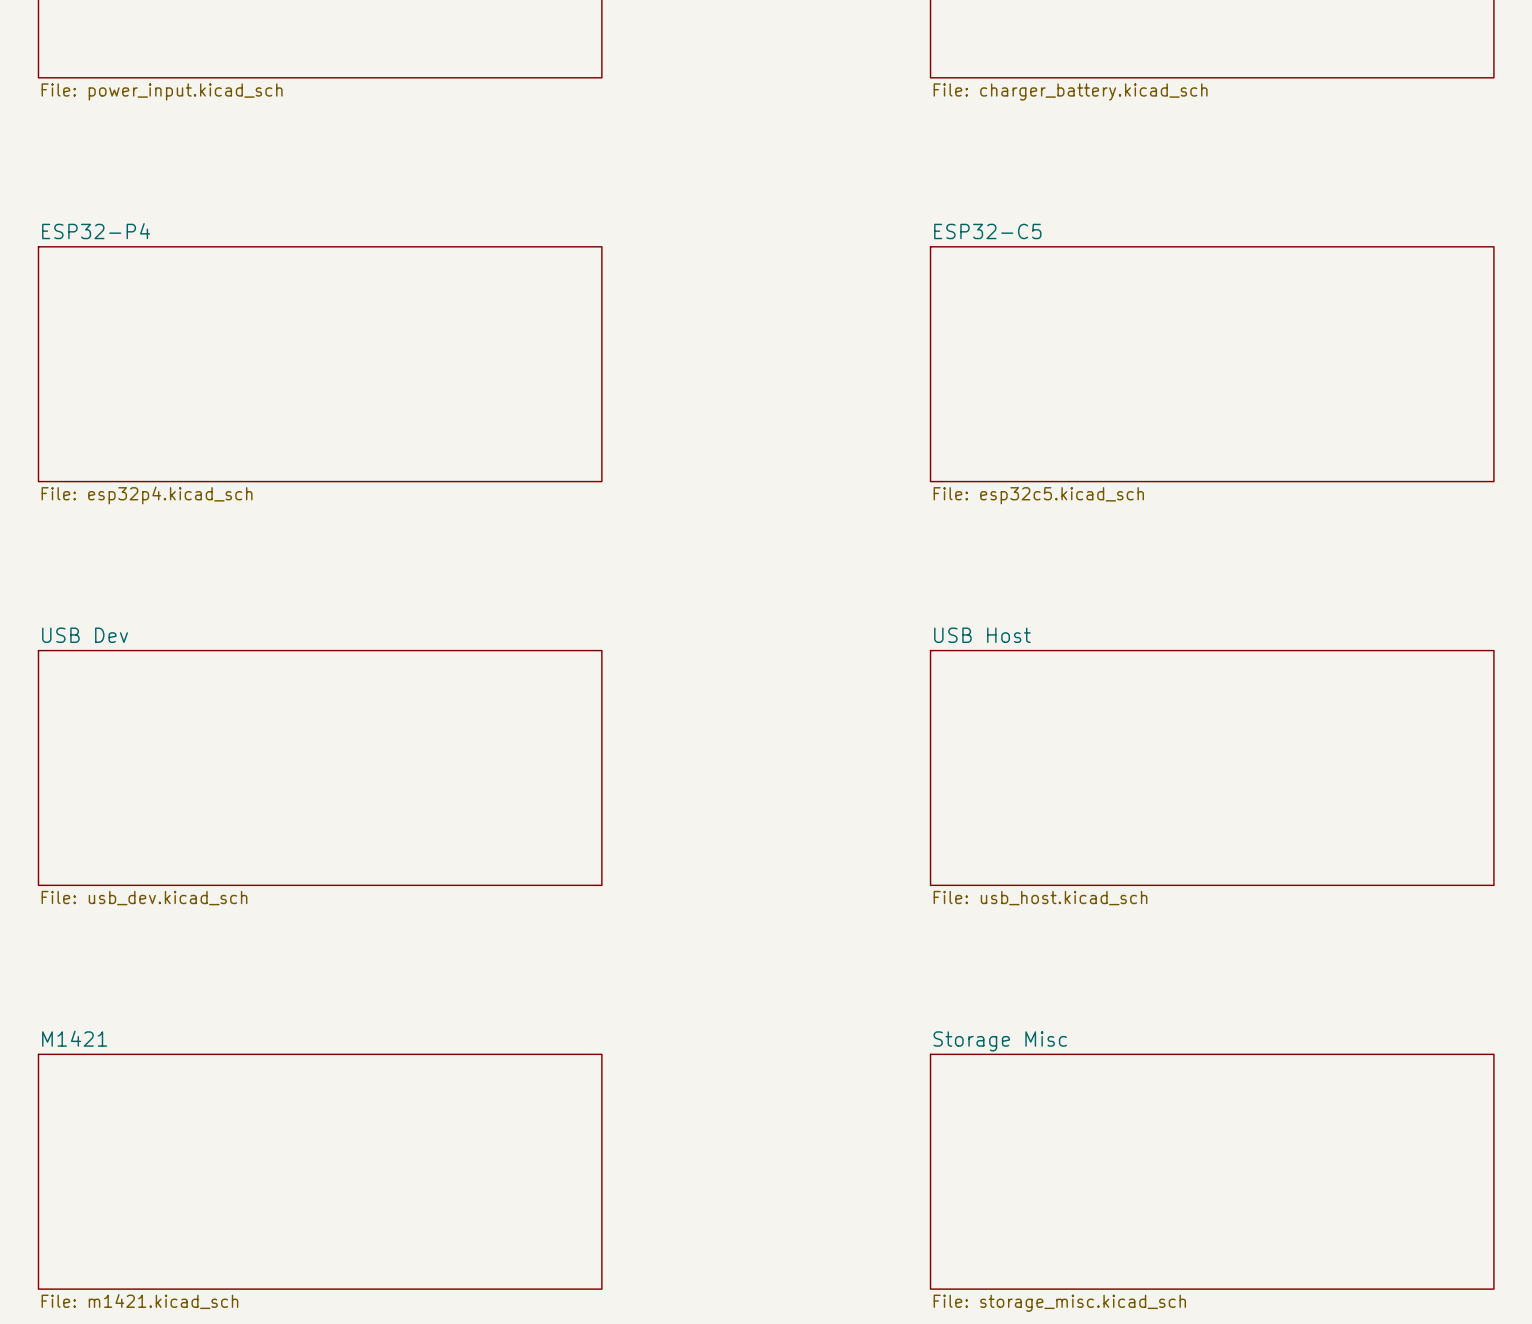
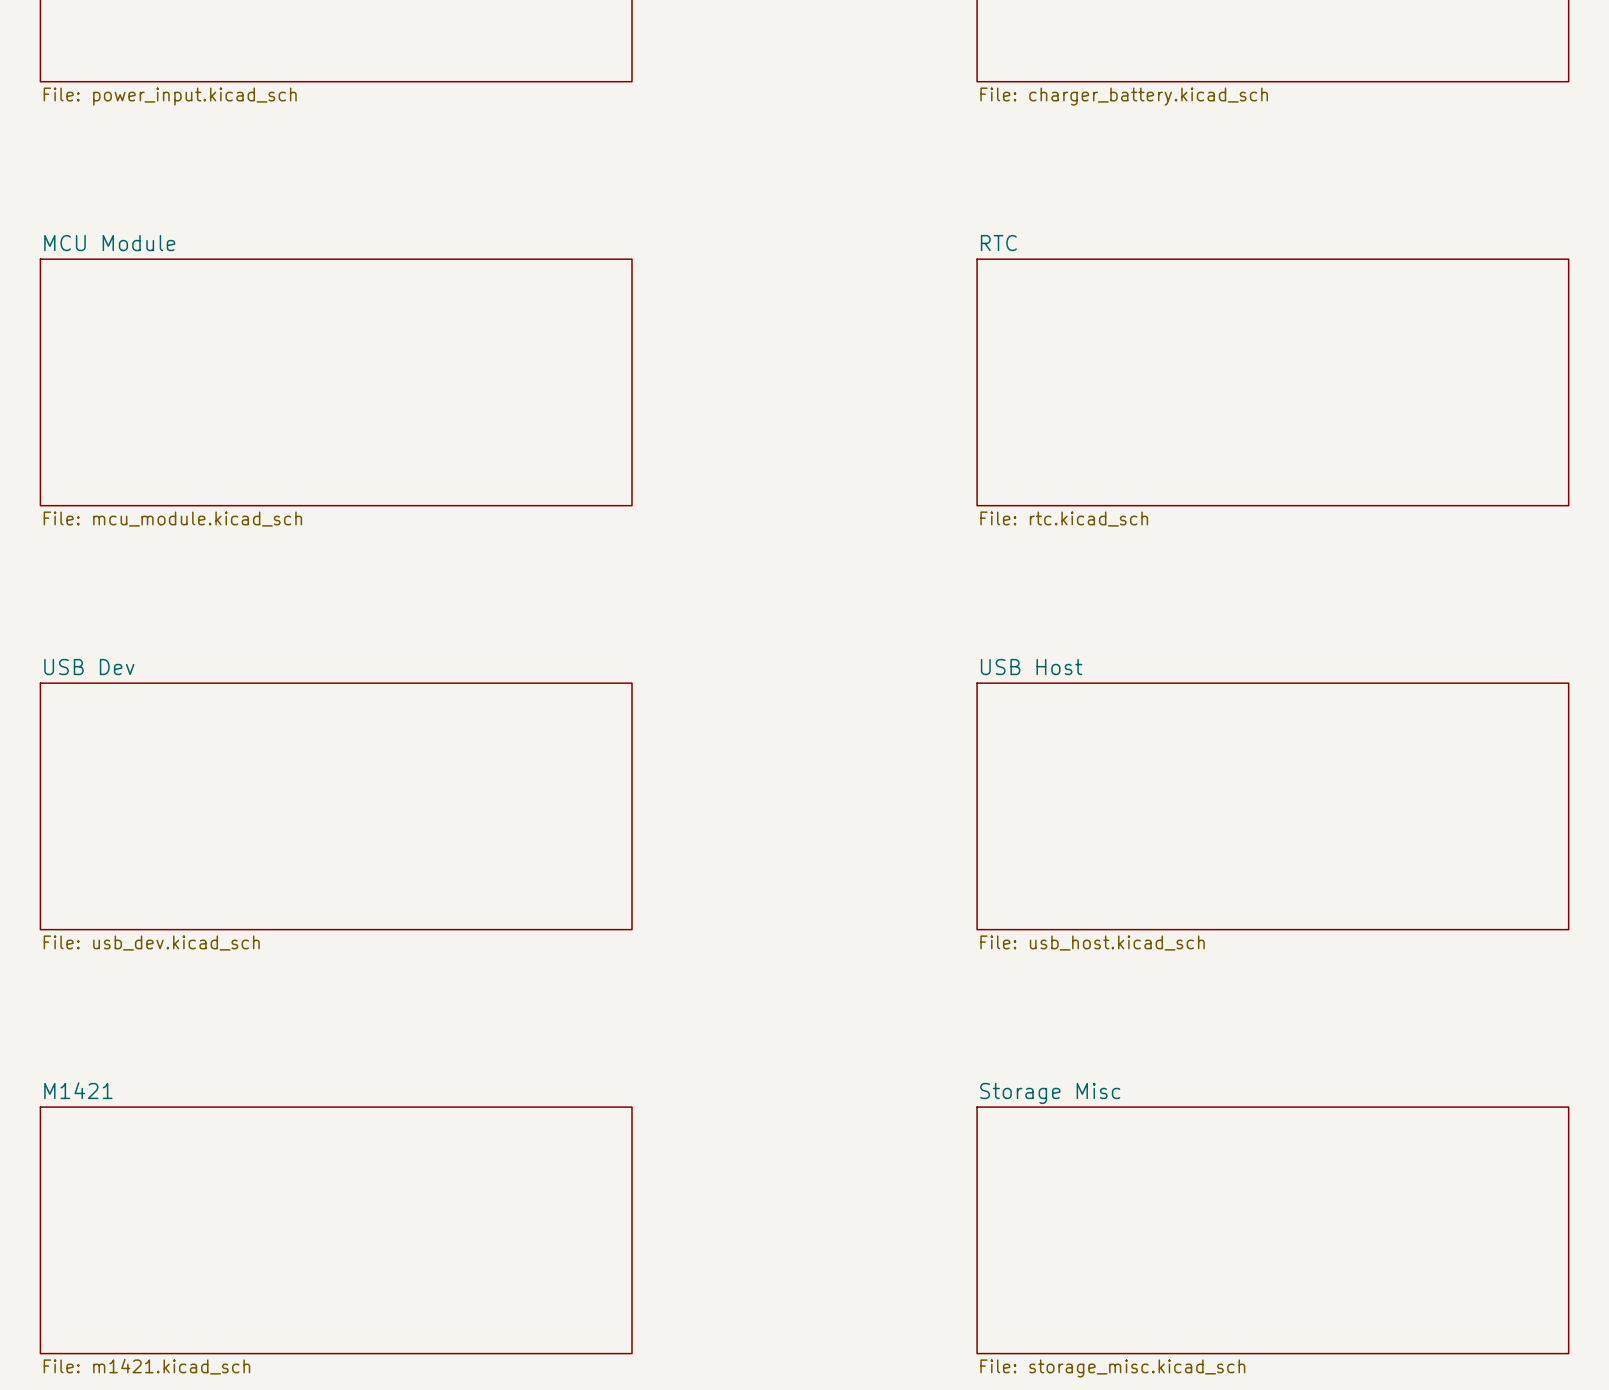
sheet ESP32-P4 name: ESP32-P4 (96, 231) -> MCU Module (109, 243)
sheet ESP32-C5 name: ESP32-C5 (987, 231) -> RTC (998, 243)
sheet ESP32-P4 value: File: esp32p4.kicad_sch (147, 495) -> File: mcu_module.kicad_sch (172, 519)
sheet ESP32-C5 value: File: esp32c5.kicad_sch (1038, 495) -> File: rtc.kicad_sch (1064, 519)

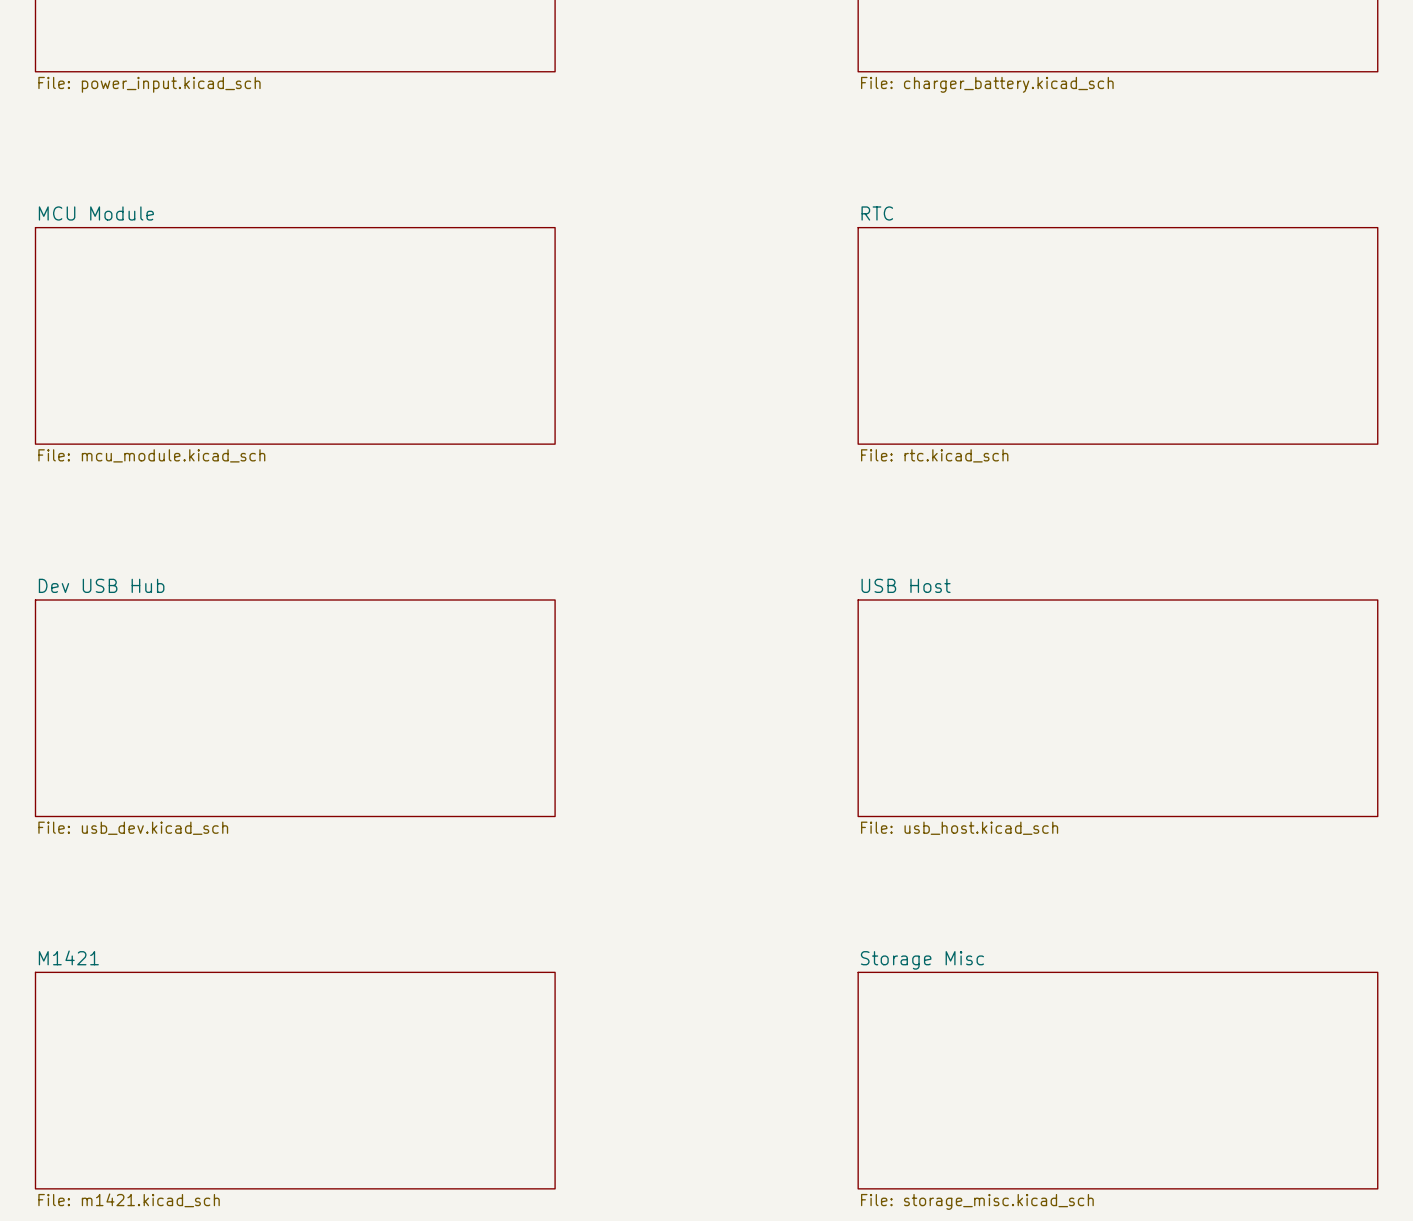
sheet USB Dev name: USB Dev (89, 667) -> Dev USB Hub (101, 585)

